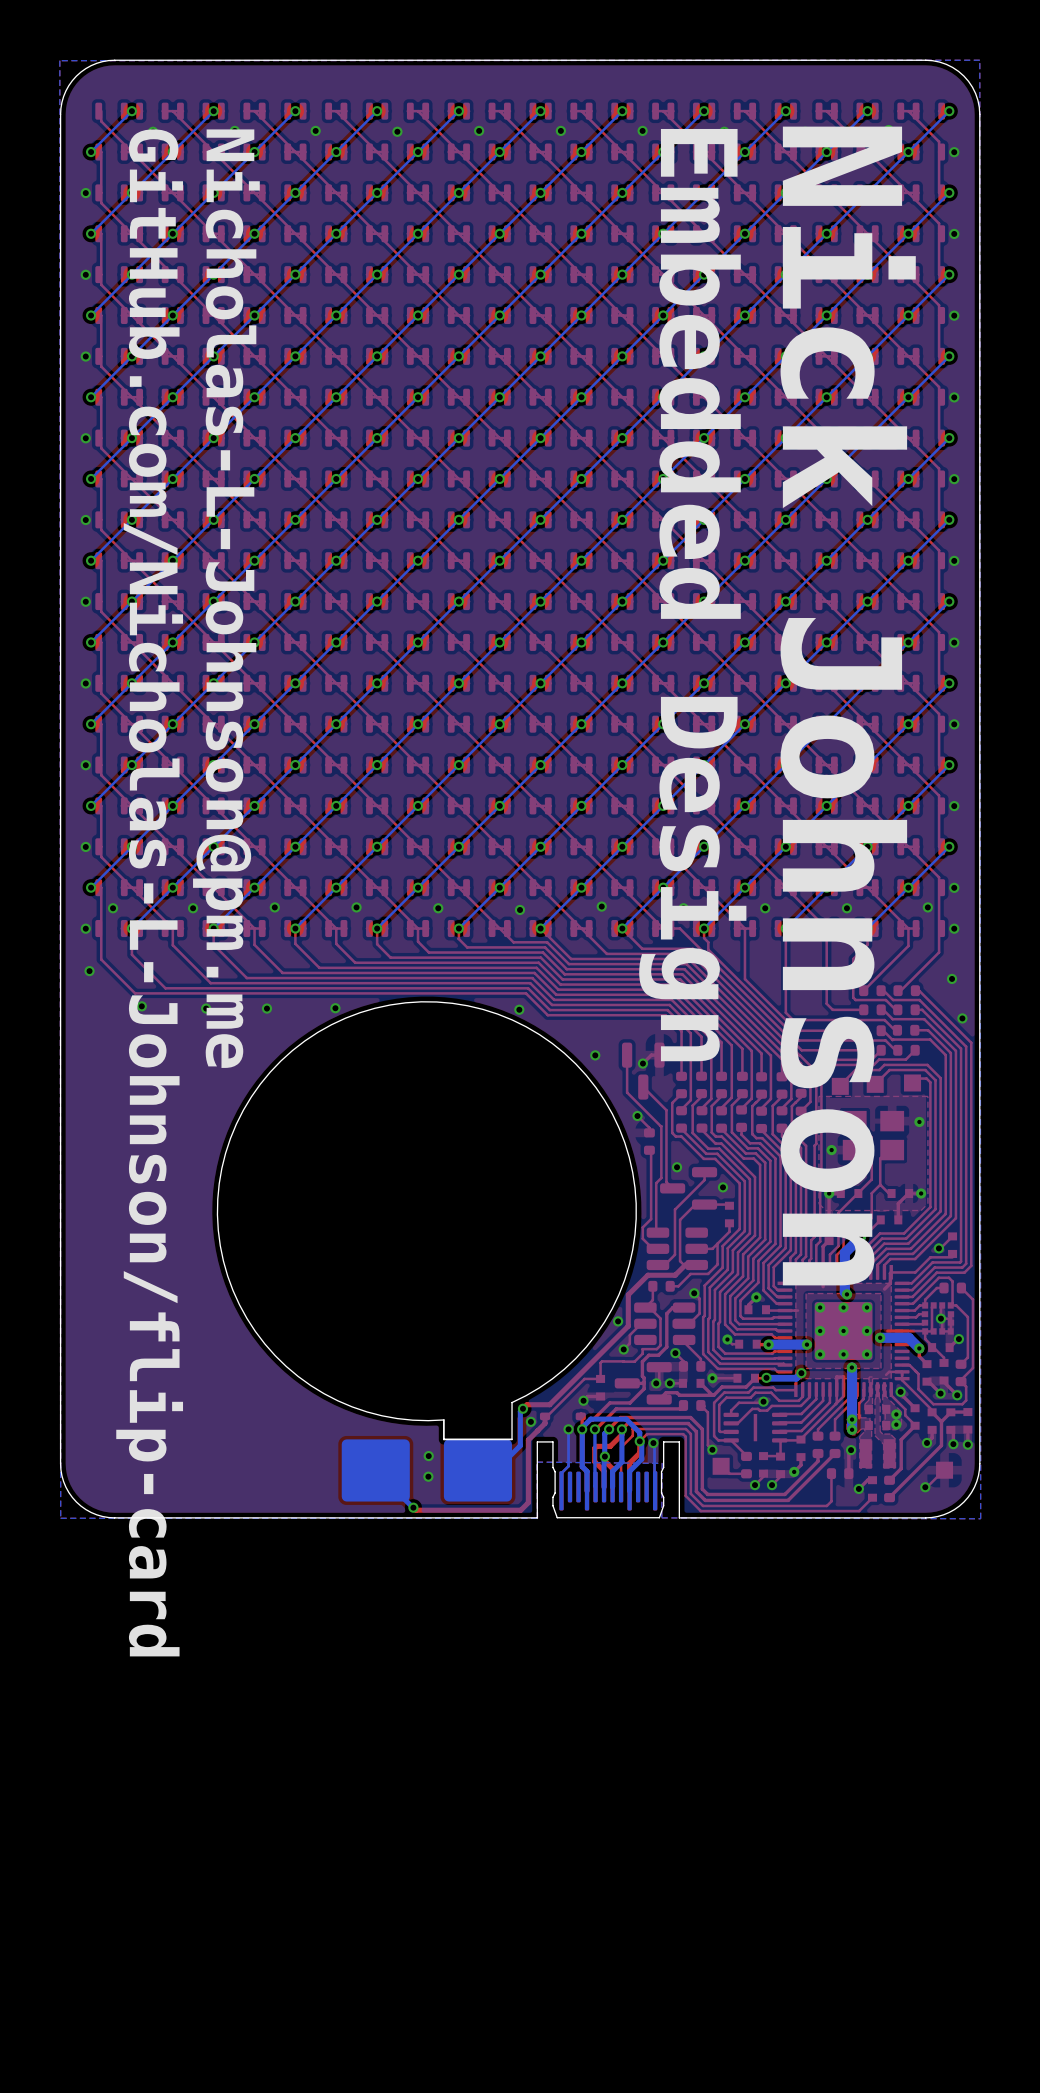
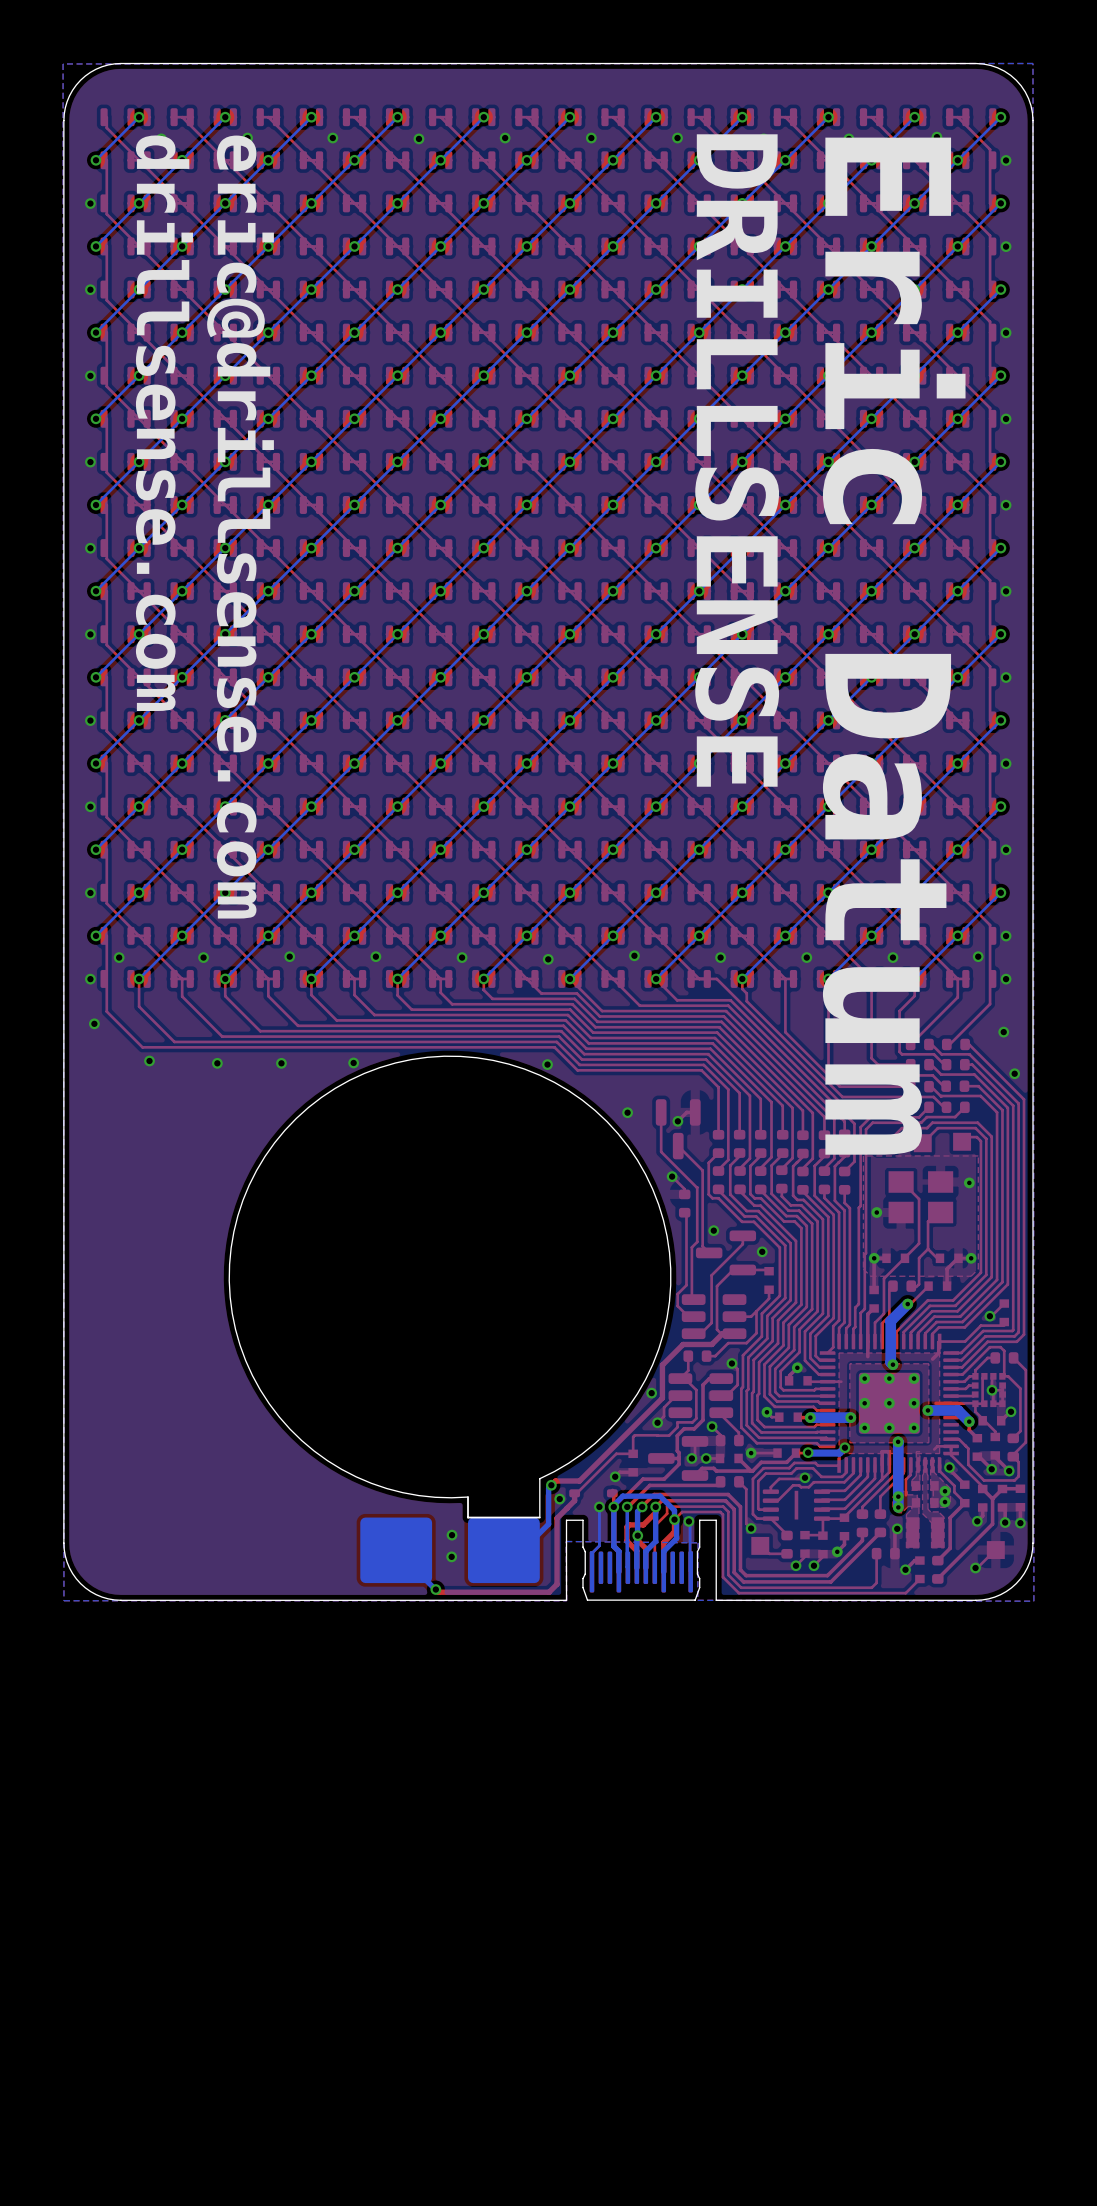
text: Embedded Design (692, 595) -> DRILLSENSE (737, 460)
text: Nicholas-L-Johnson@pm.me (226, 598) -> eric@drillsense.com (240, 527)
text: Nick Johnson (848, 706) -> Eric Datum (894, 646)
text: GitHub.com/Nicholas-L-Johnson/flip-card (149, 892) -> drillsense.com (164, 423)

